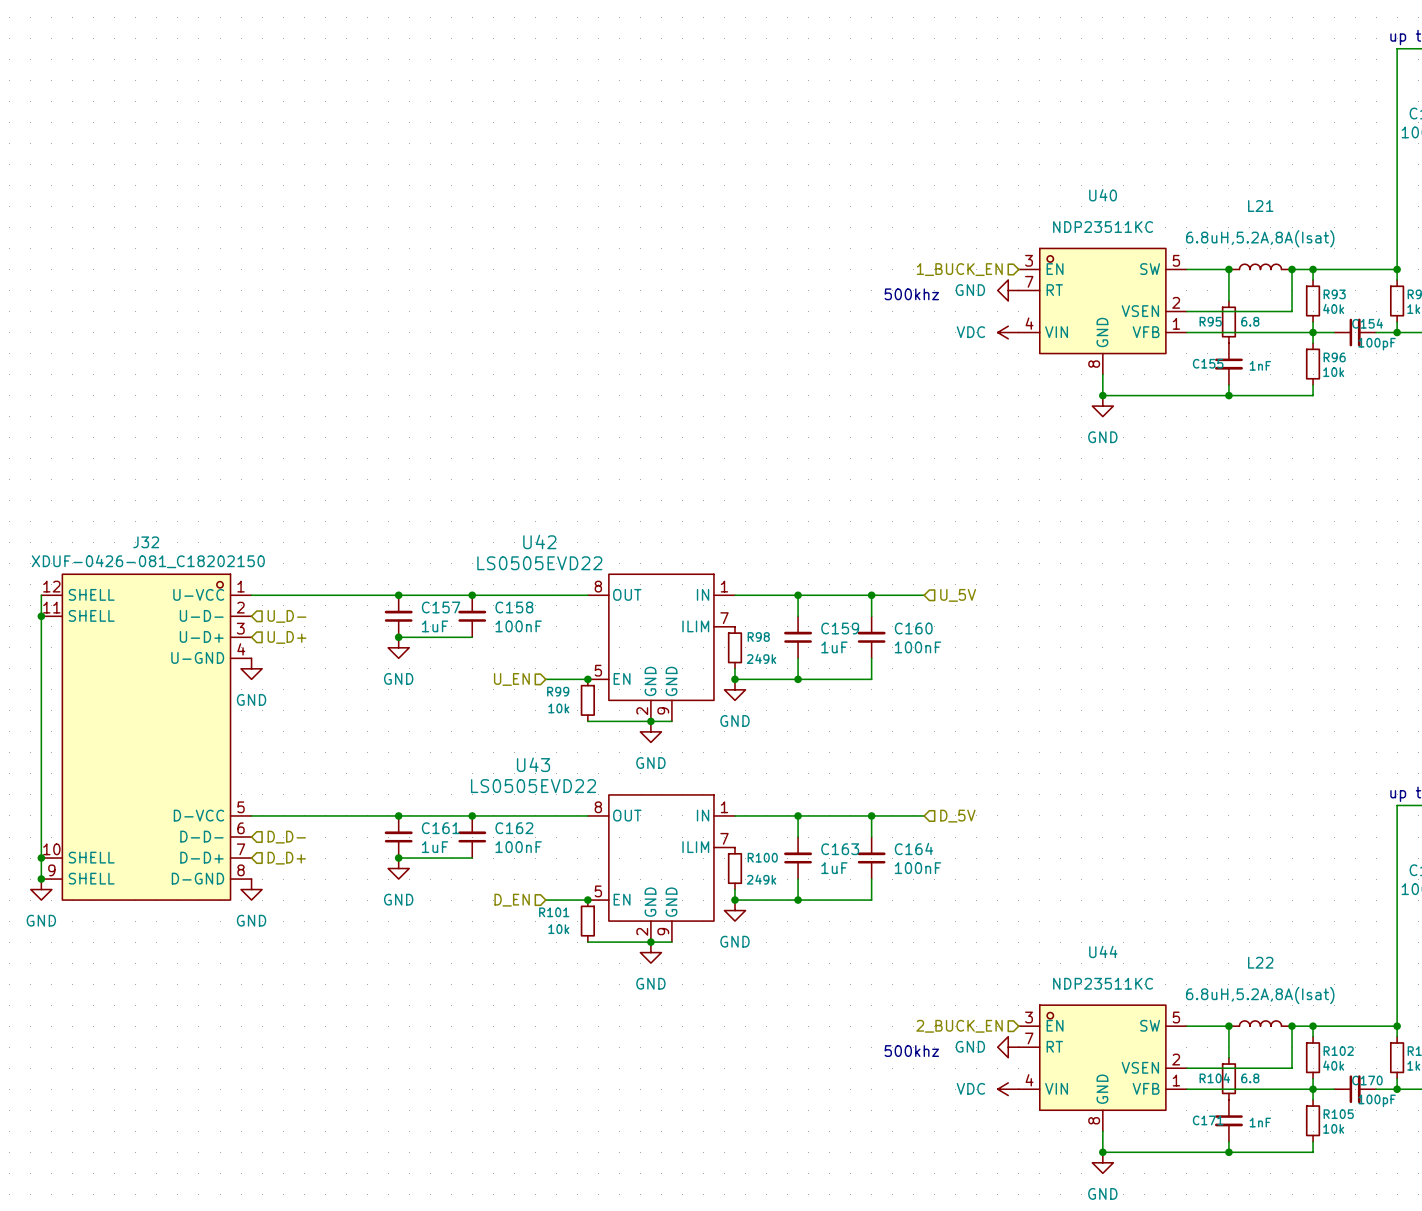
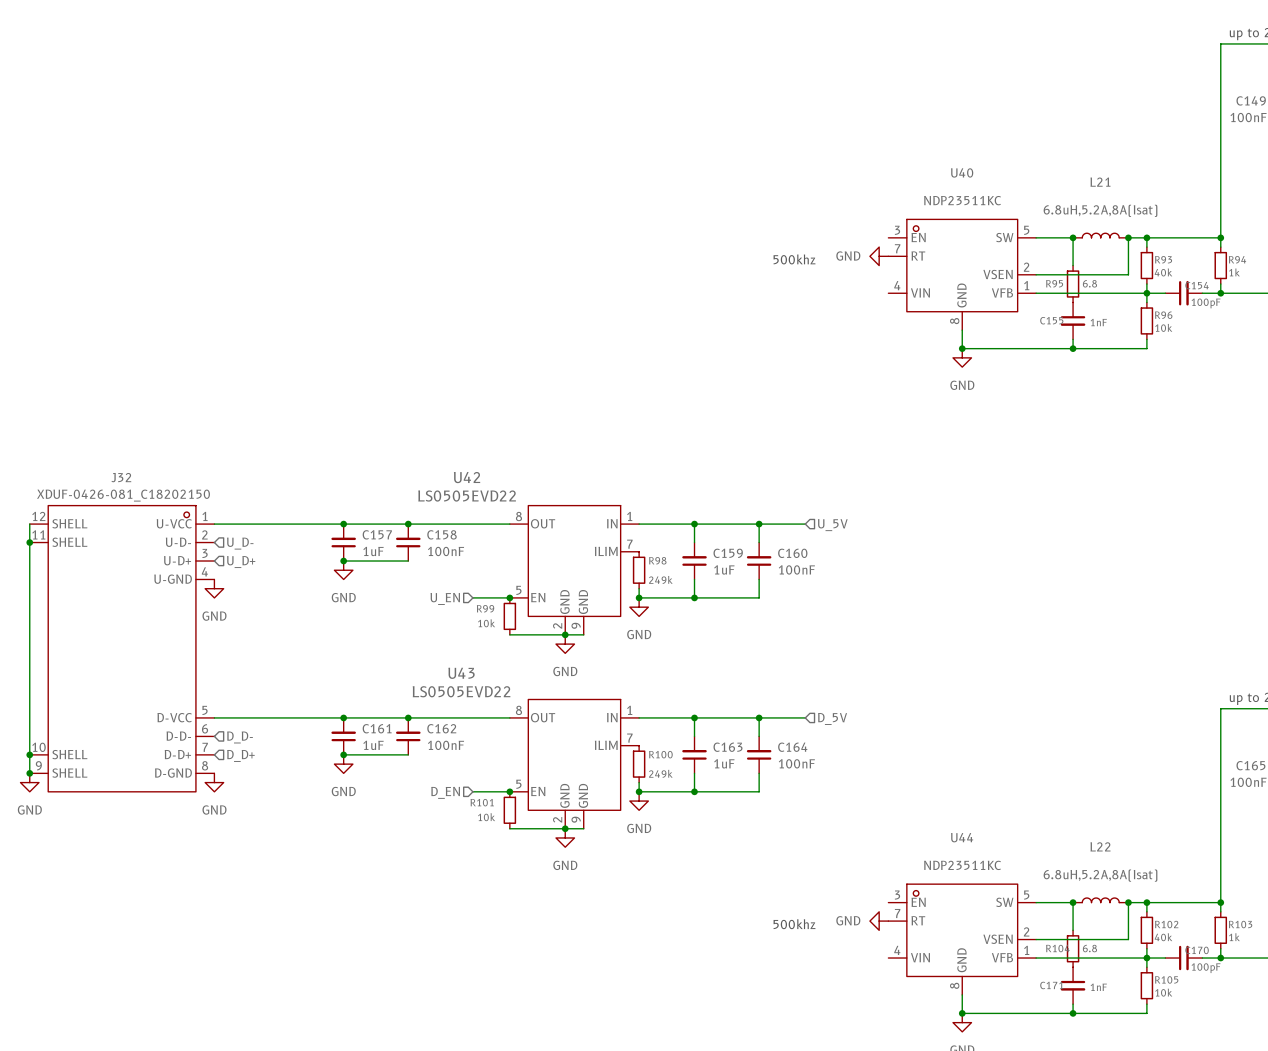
hierarchical label: 1_BUCK_EN (959, 269) -> none
power symbol: VDC (1008, 332) -> none
hierarchical label: 2_BUCK_EN (959, 1026) -> none
power symbol: VDC (1008, 1089) -> none

